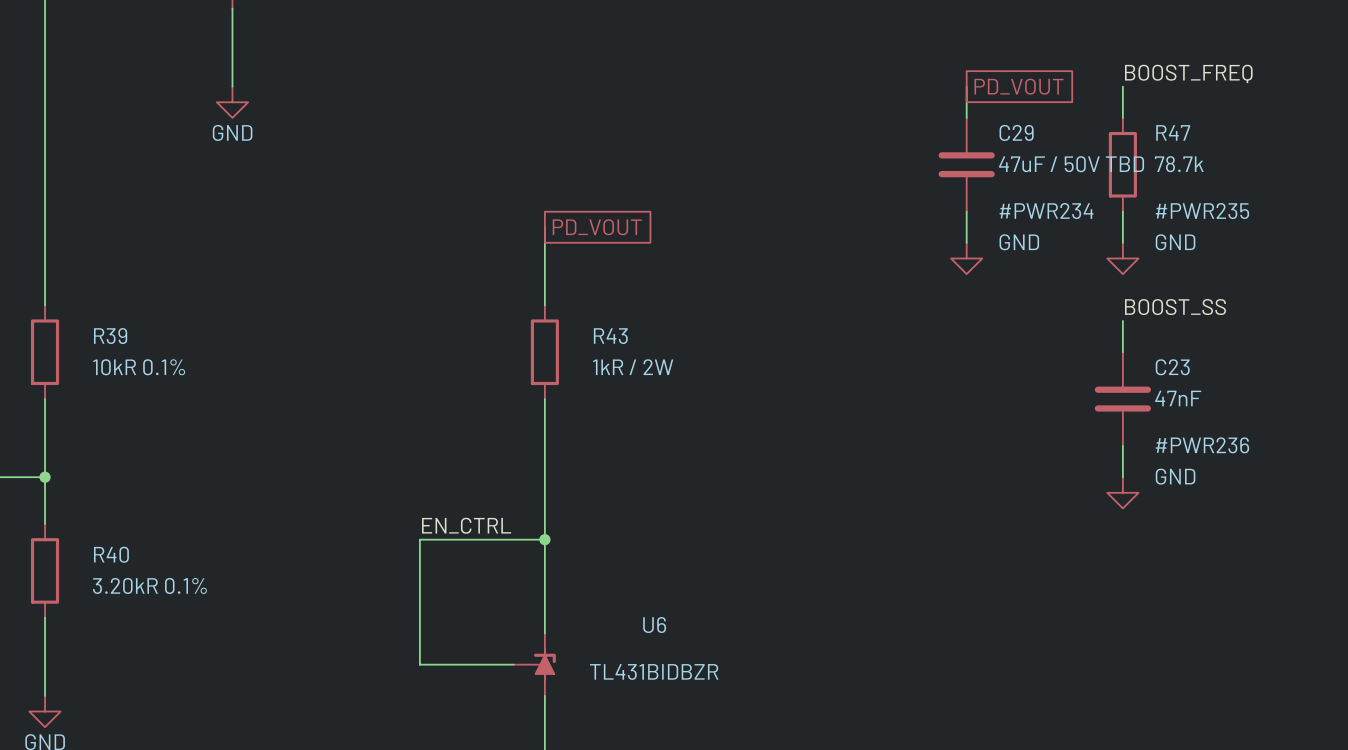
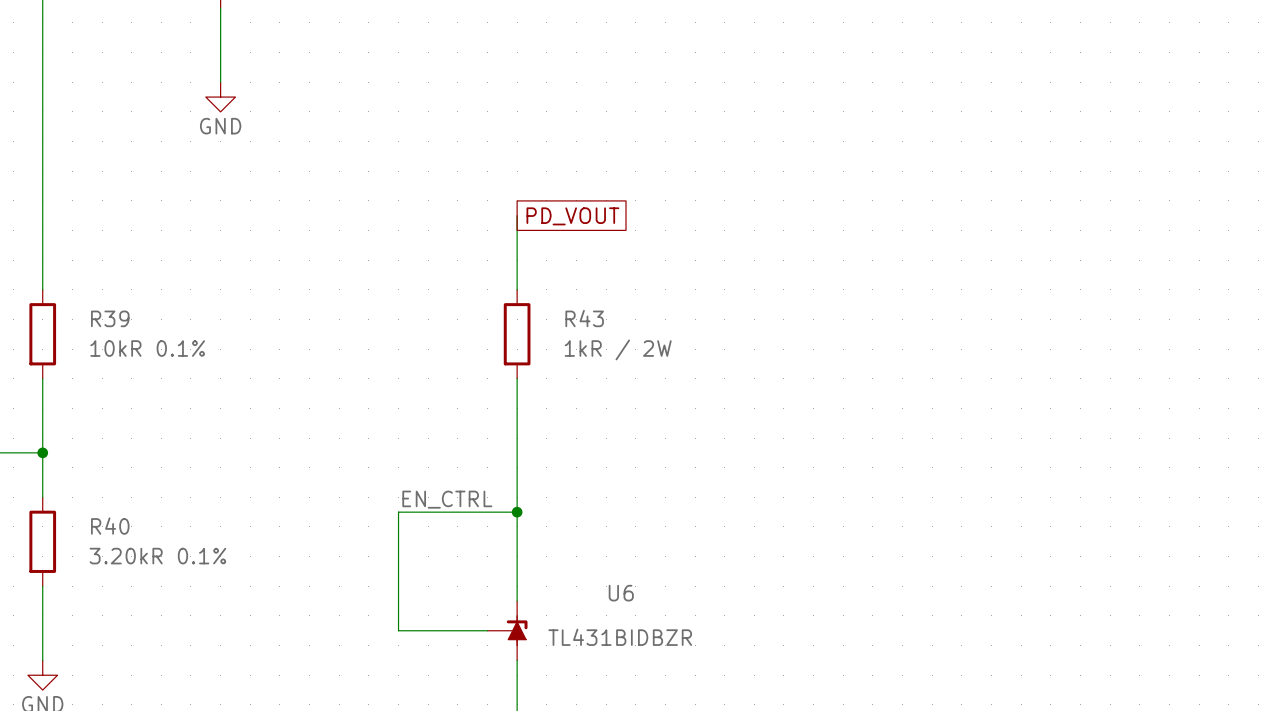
label: BOOST_FREQ (1188, 73) -> none
wire: (966, 86) (966, 117) -> none
global label: PD_VOUT (1019, 86) -> none
wire: (1122, 86) (1122, 117) -> none
C29: 47uF / 50V TBD (966, 164) -> none
R47: 78.7k (1122, 164) -> none
wire: (966, 211) (966, 242) -> none
wire: (1122, 211) (1122, 242) -> none
#PWR234: GND (966, 258) -> none
#PWR235: GND (1122, 258) -> none
label: BOOST_SS (1175, 307) -> none
wire: (1122, 320) (1122, 352) -> none
C23: 47nF (1122, 399) -> none
wire: (1122, 445) (1122, 477) -> none
#PWR236: GND (1122, 492) -> none

